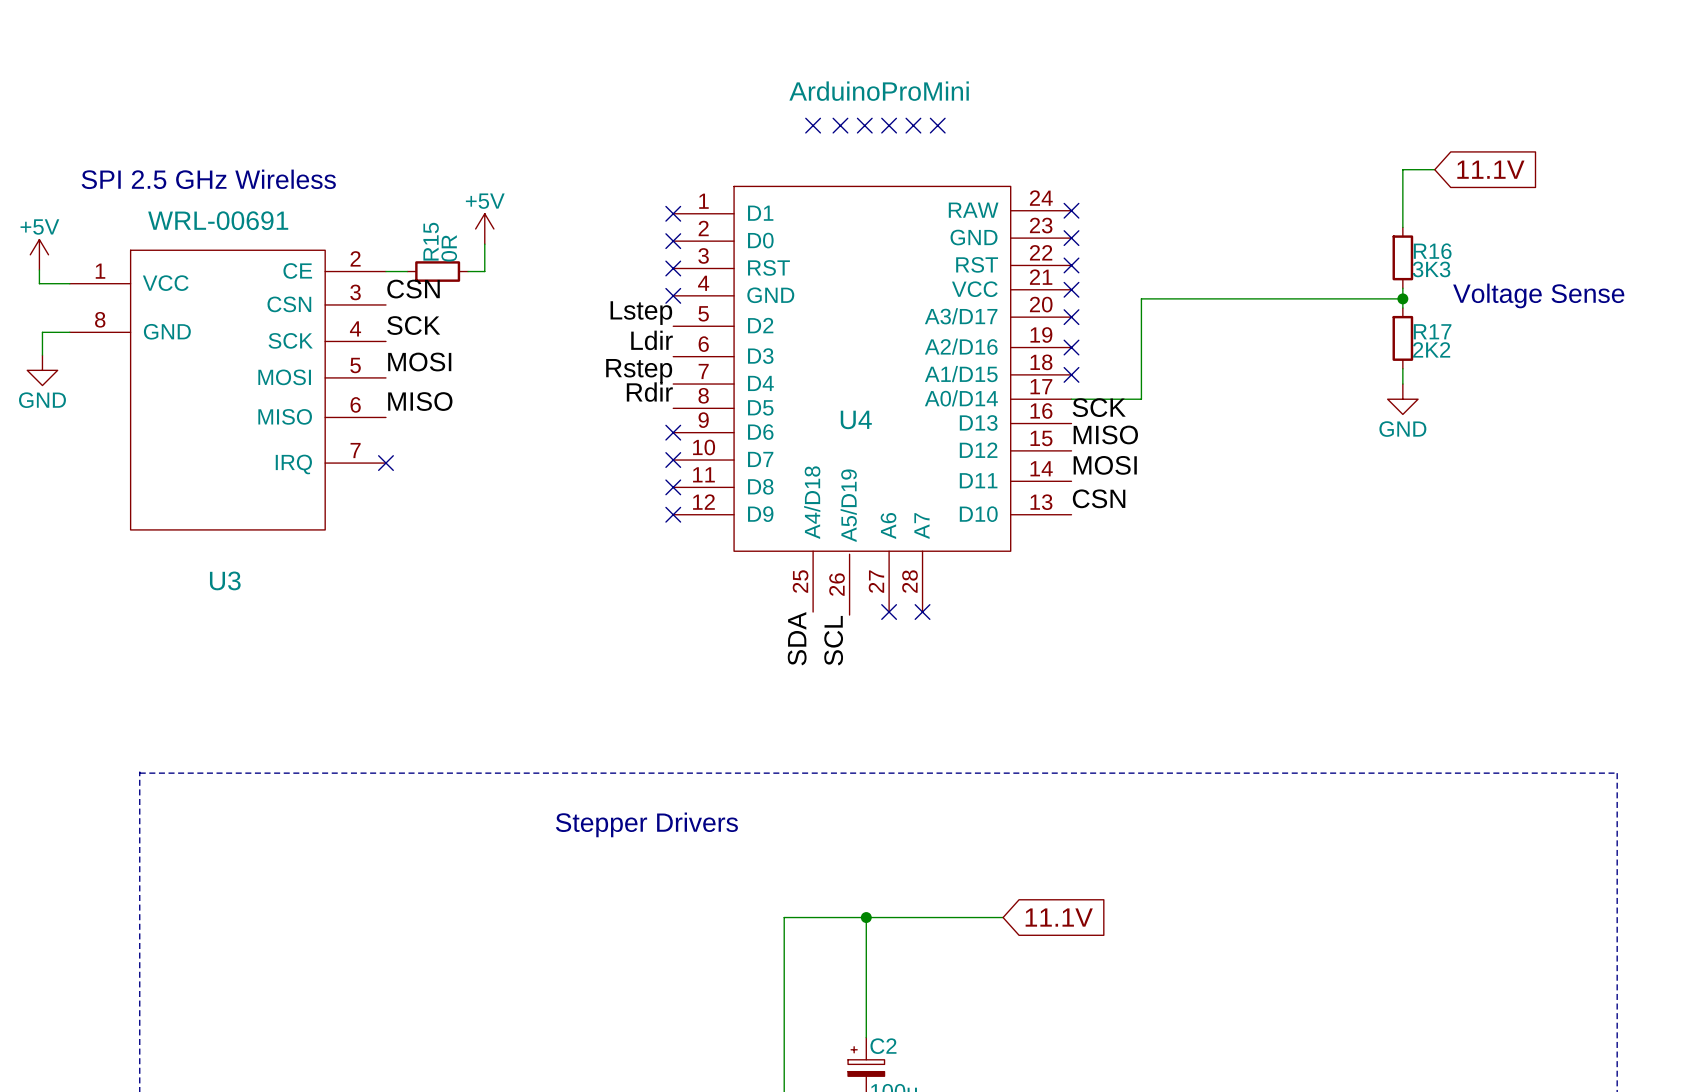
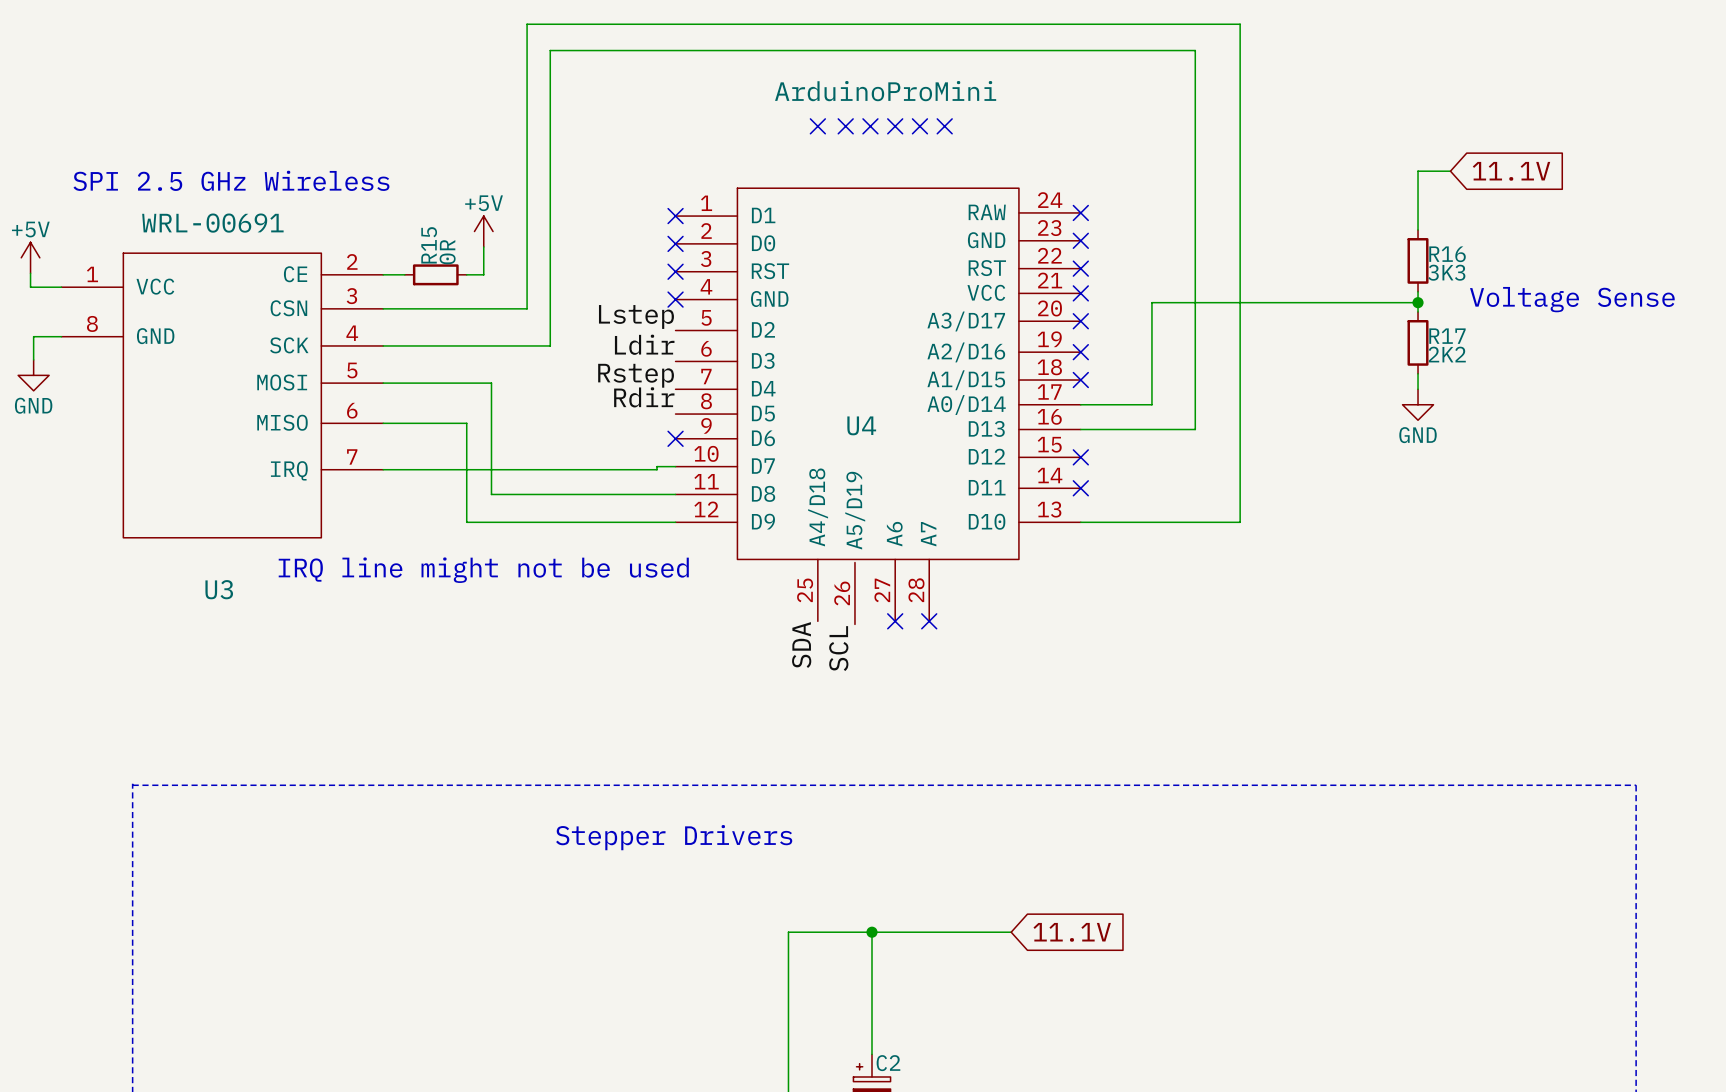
label: CSN (413, 289) -> none
wire: none -> (383, 308) (527, 308) (527, 24) (1240, 24) (1240, 522) (1080, 522)
label: SCK (413, 325) -> none
wire: none -> (383, 345) (550, 345) (550, 50) (1195, 50) (1195, 429) (1080, 429)
label: MOSI (419, 362) -> none
wire: none -> (383, 383) (491, 383) (491, 494) (675, 494)
label: MISO (420, 401) -> none
label: SCK (1099, 407) -> none
wire: none -> (383, 423) (466, 423) (466, 522) (675, 522)
label: MISO (1105, 434) -> none
no-connect mark: none -> (1080, 457)
wire: none -> (675, 466) (656, 466) (656, 469) (383, 469)
no-connect mark: (673, 460) -> none
no-connect mark: (385, 463) -> none
label: MOSI (1105, 465) -> none
no-connect mark: none -> (1080, 488)
no-connect mark: (673, 487) -> none
label: CSN (1099, 498) -> none
no-connect mark: (673, 514) -> none
text: none -> IRQ line might not be used (483, 570)

